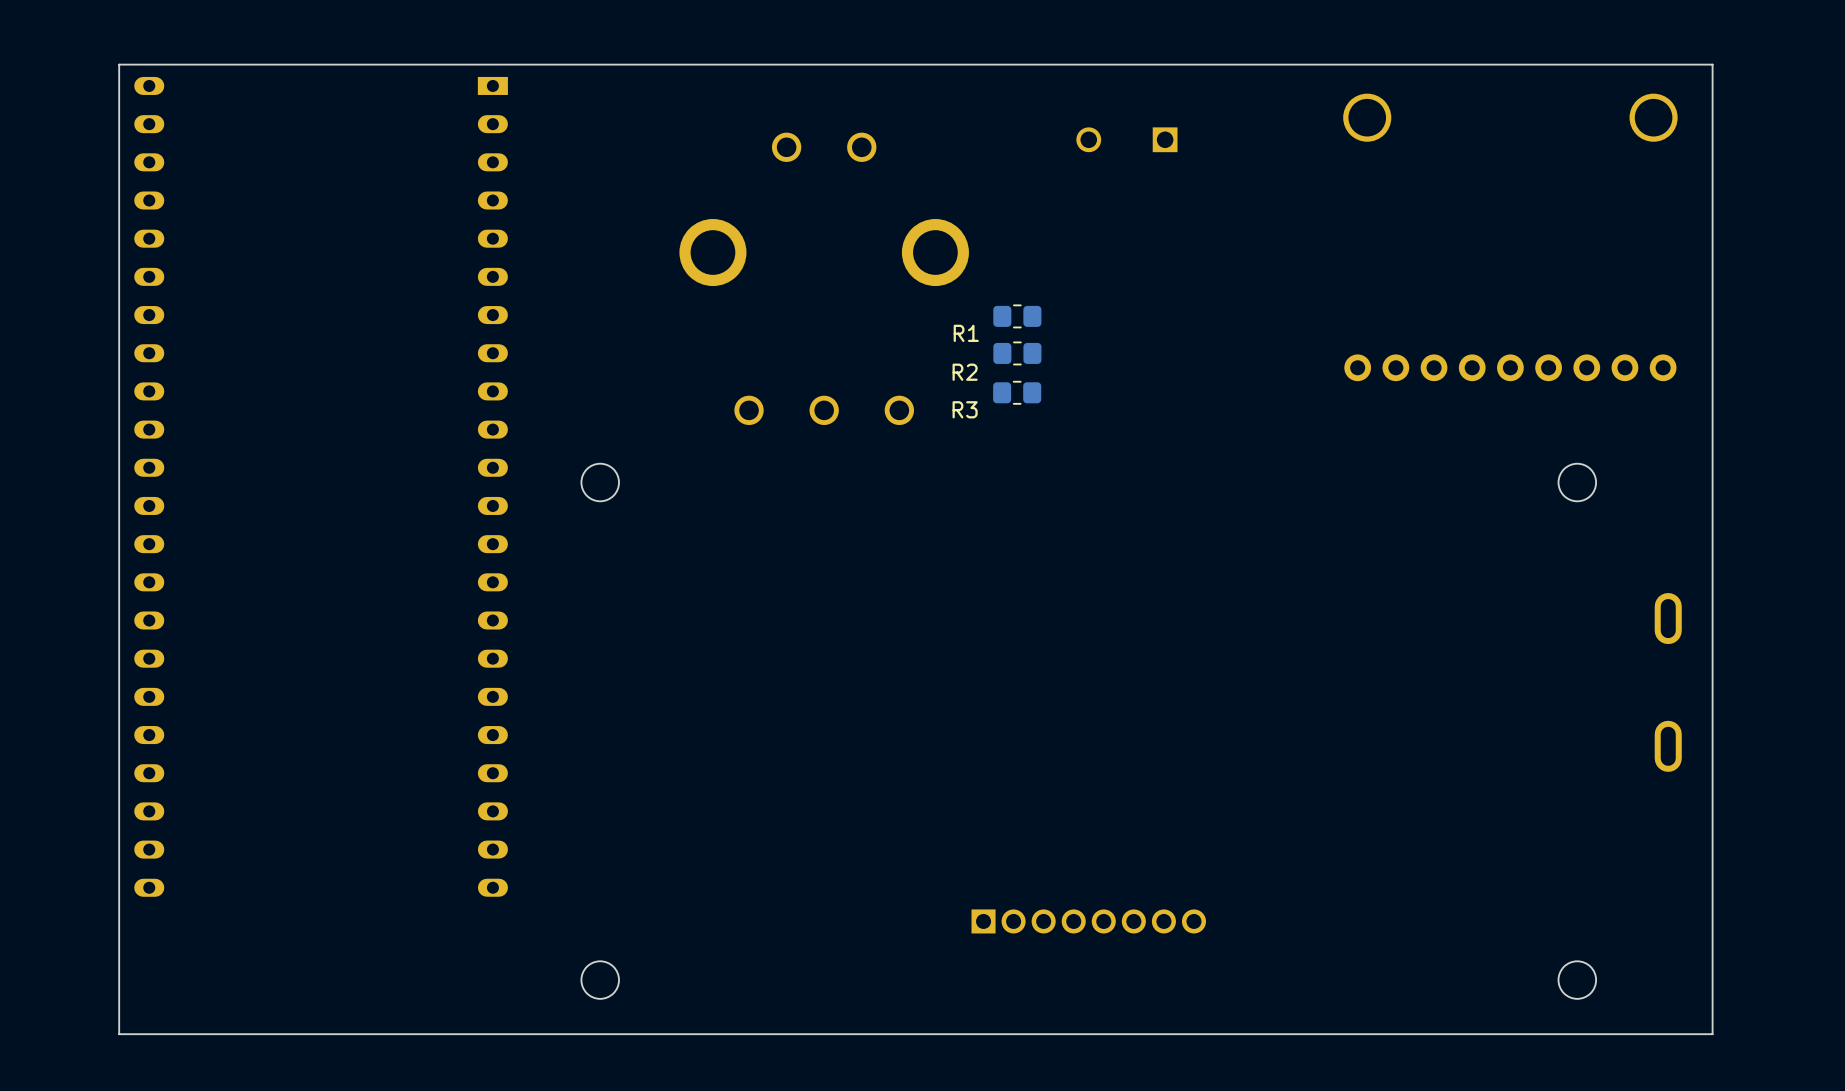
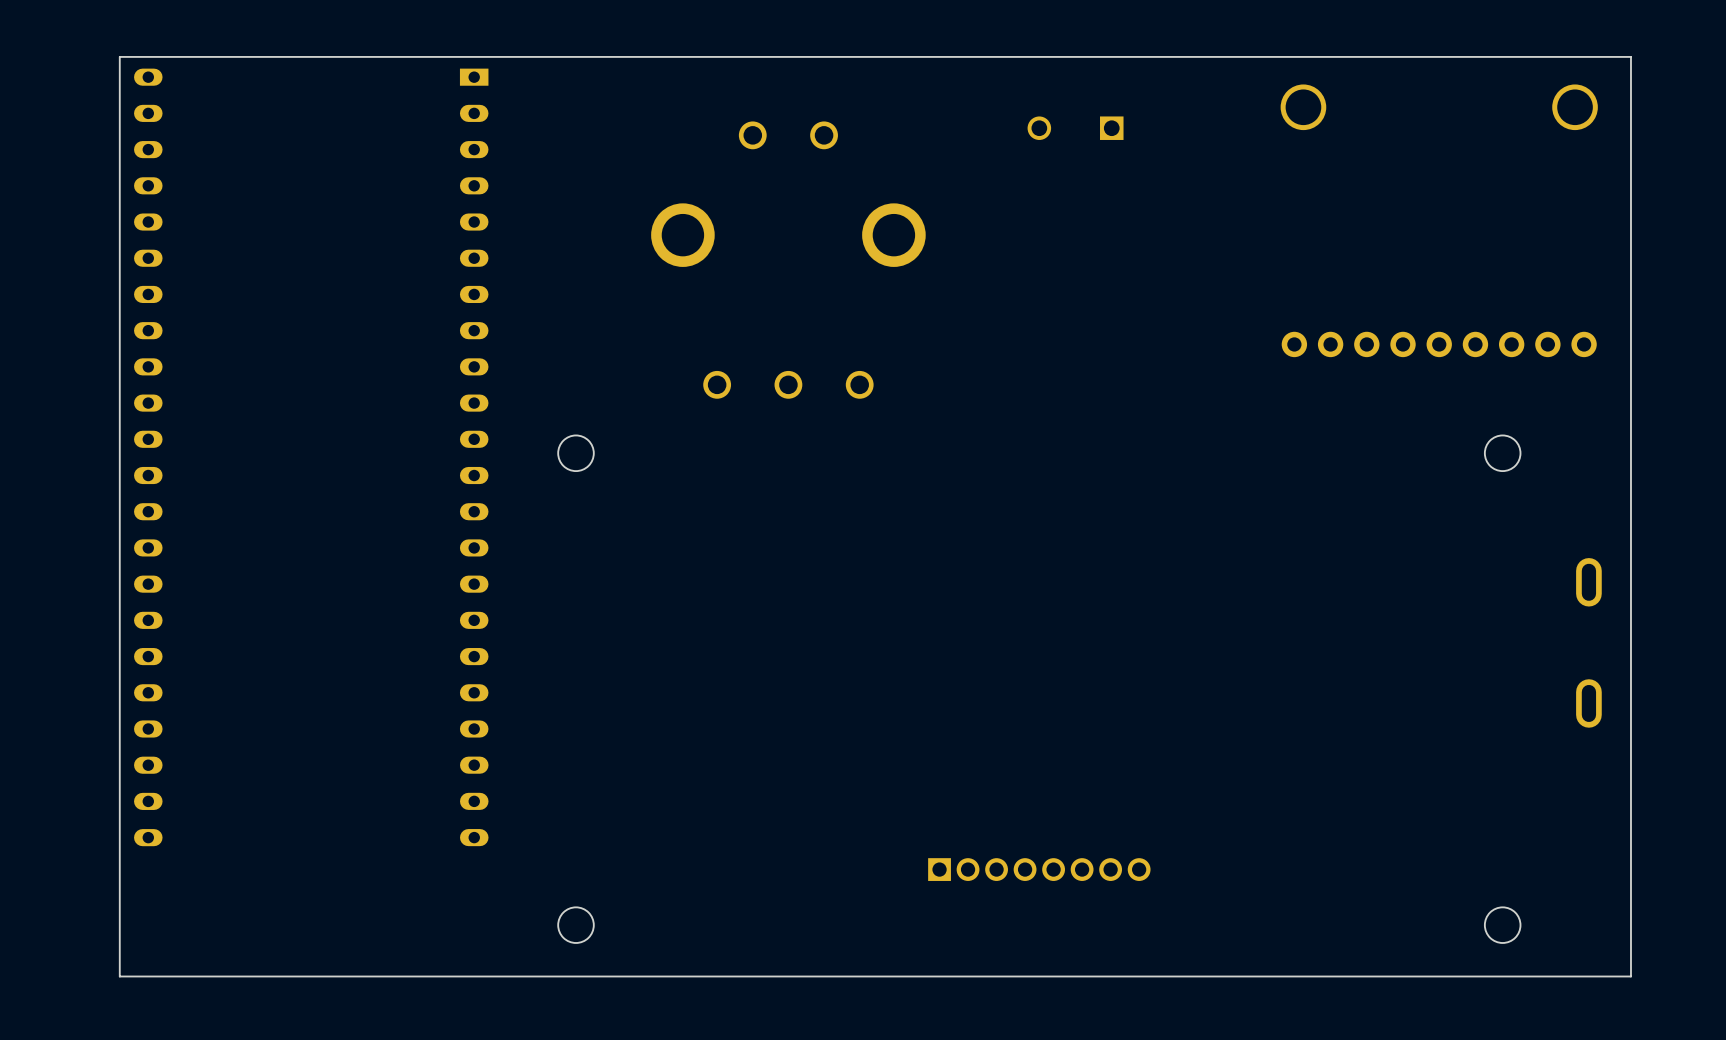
part: (1017, 316) -> none
text: R1 (966, 333) -> none
R2: (1017, 353) -> none
R3: (1017, 392) -> none

